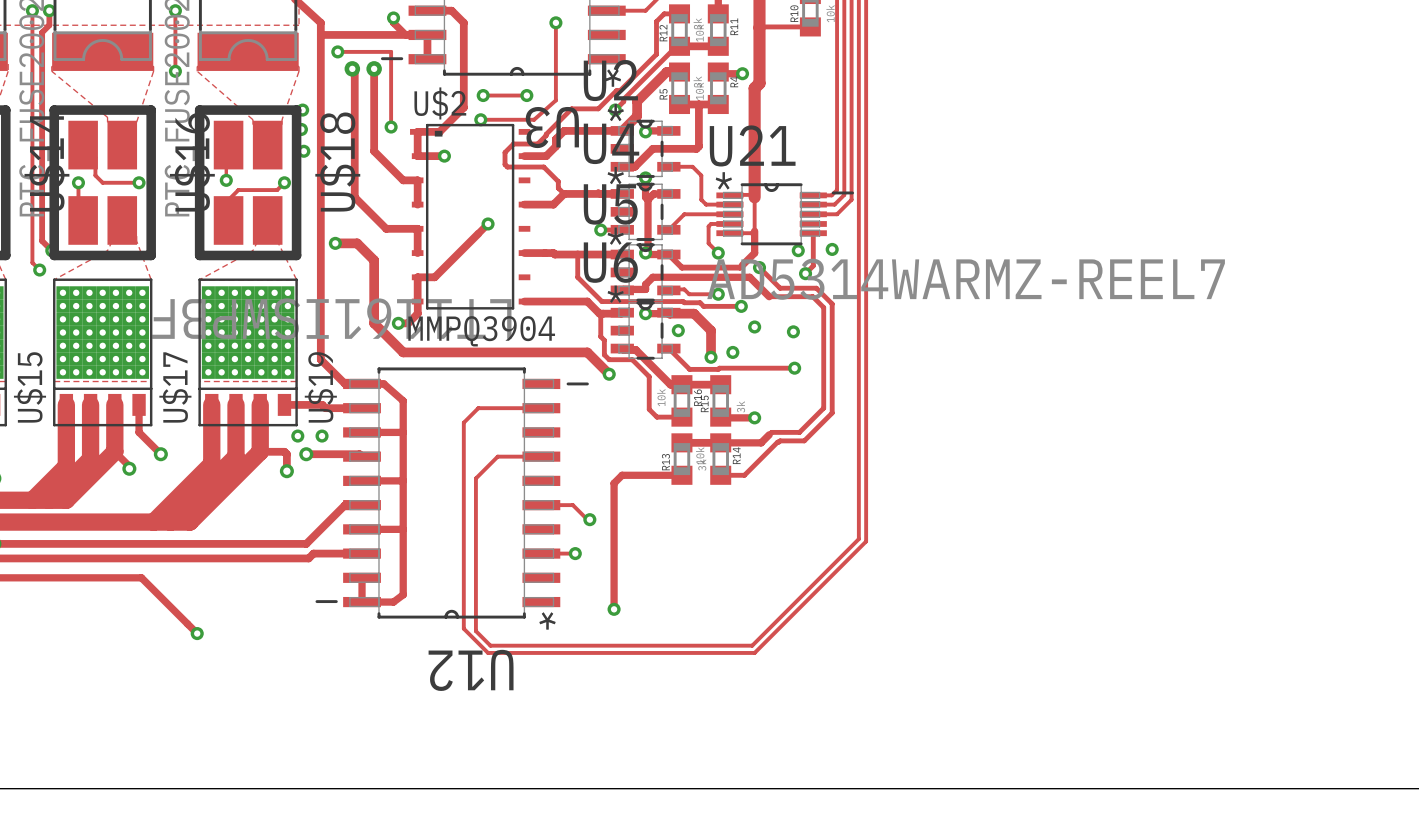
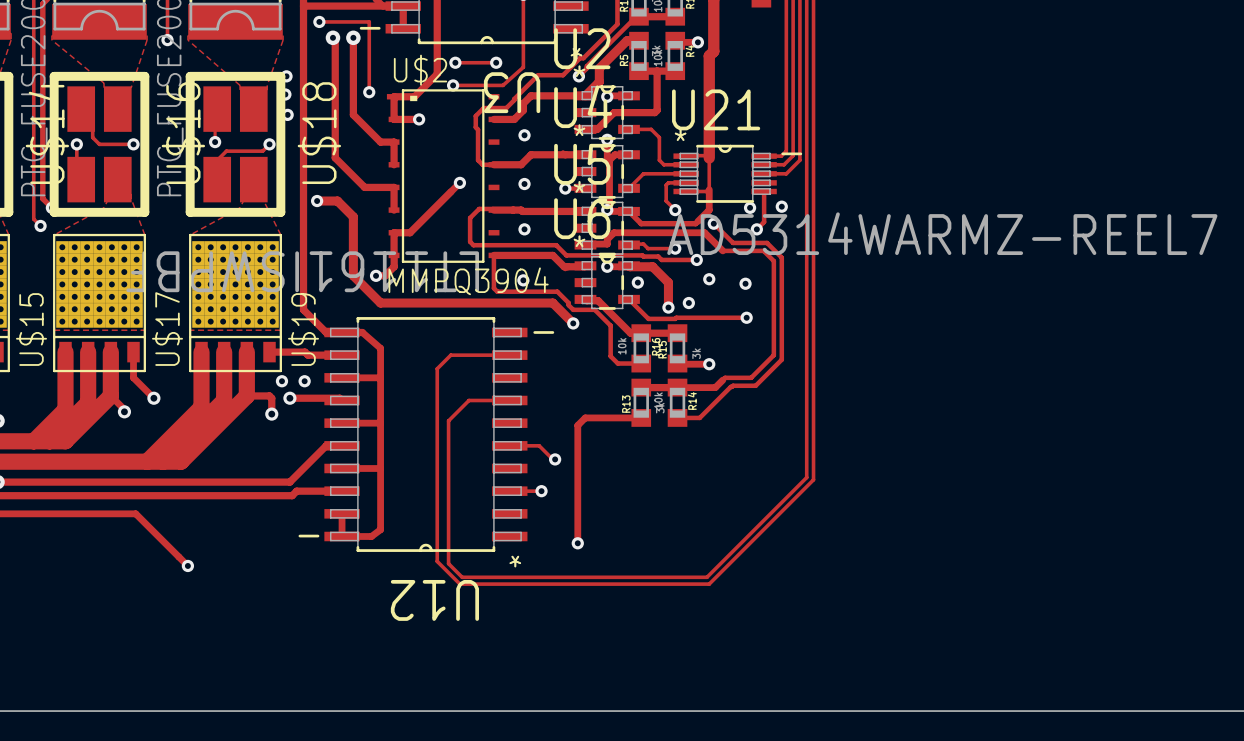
track: (507, 167) (543, 167) (558, 181) (558, 188) (564, 193) -> (478, 129) (478, 160) (482, 164) (494, 164)
via: none -> (524, 135)
via: none -> (524, 184)
track: (577, 254) (577, 277) (591, 290) -> (494, 210) (479, 208) (470, 218) (470, 241) (473, 245) (556, 245)
via: none -> (524, 229)
track: (600, 316) (600, 336) (604, 340) (604, 352) -> (493, 255) (493, 288) (497, 291) (557, 291) (568, 303)
via: none -> (523, 280)

